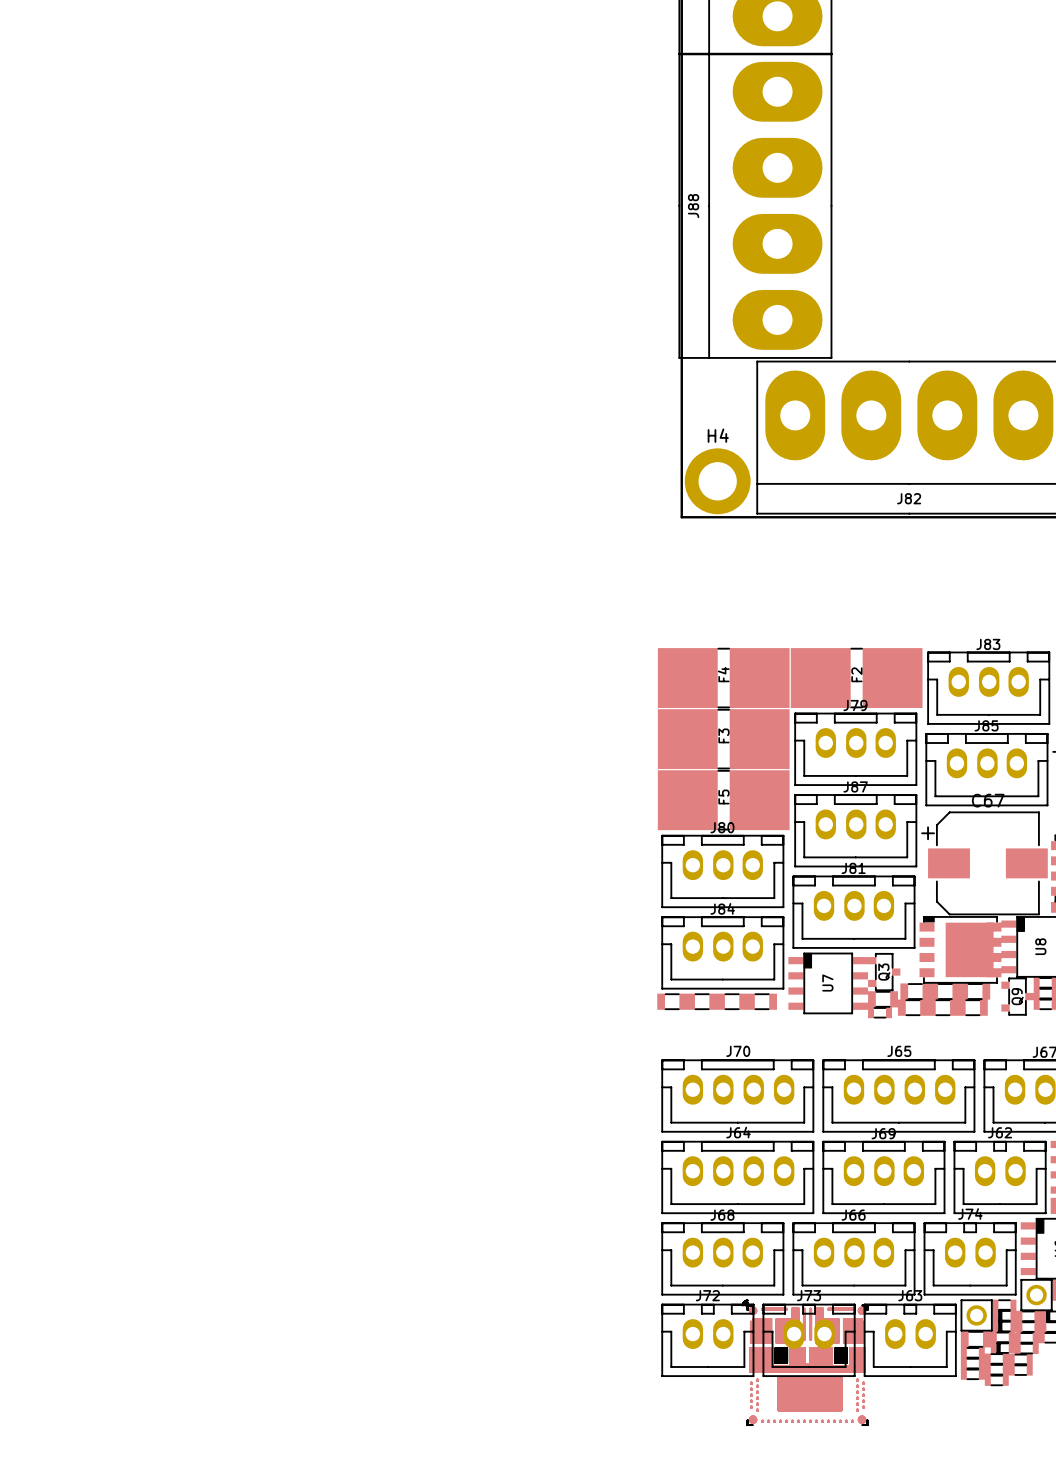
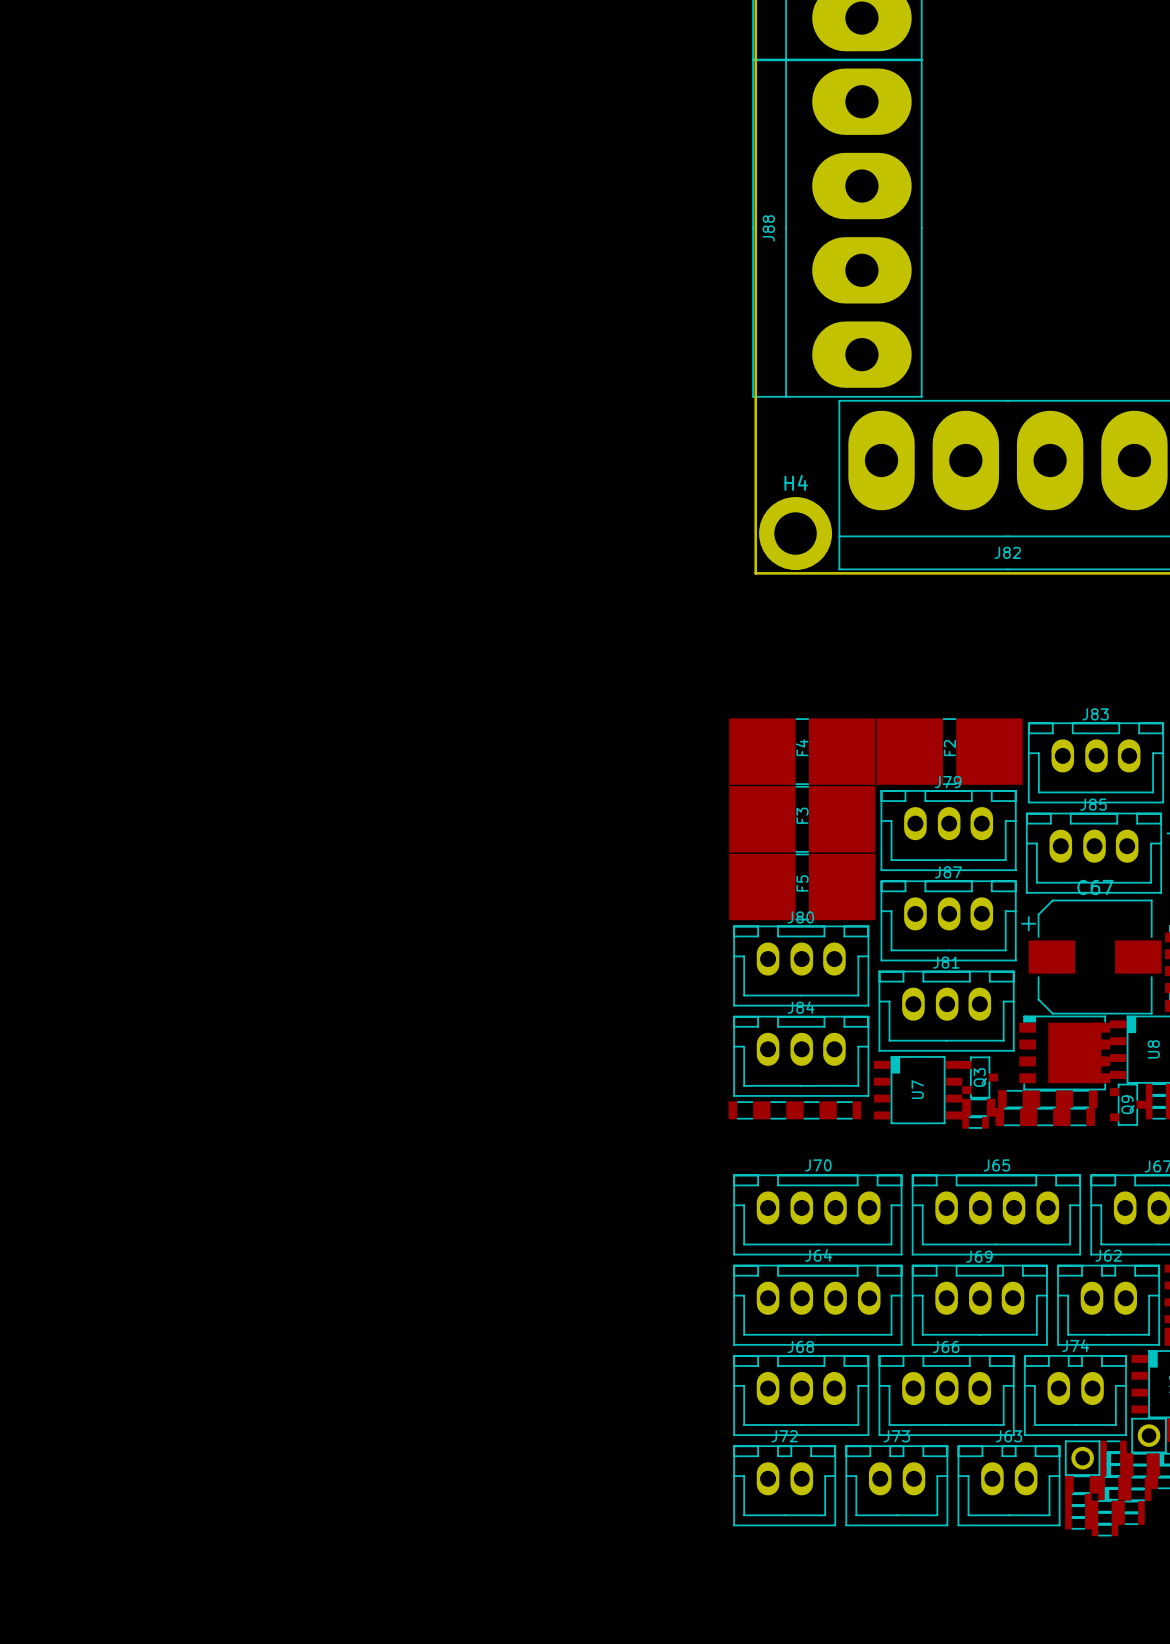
part: (805, 1362) -> none
part: (805, 1362) -> none

